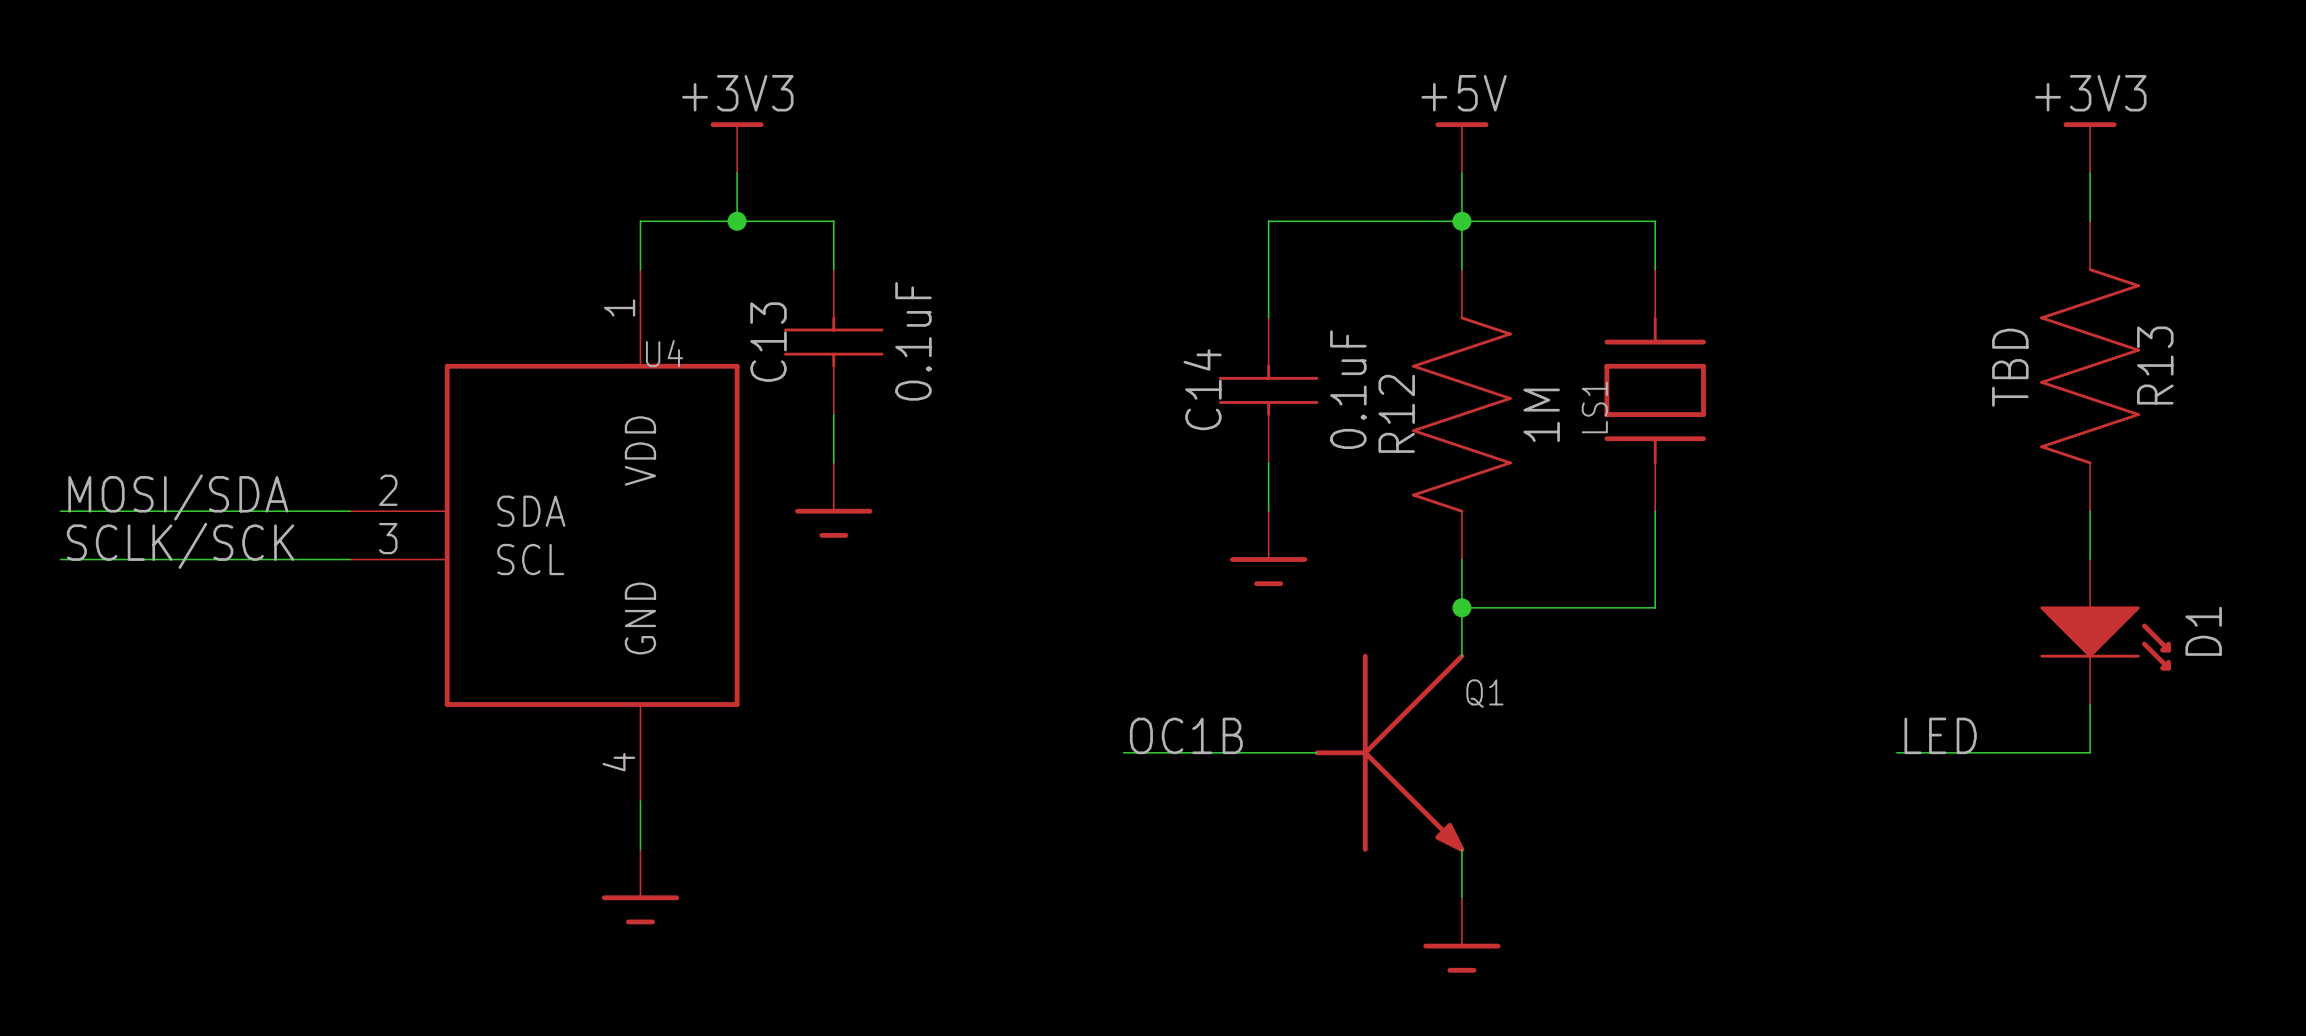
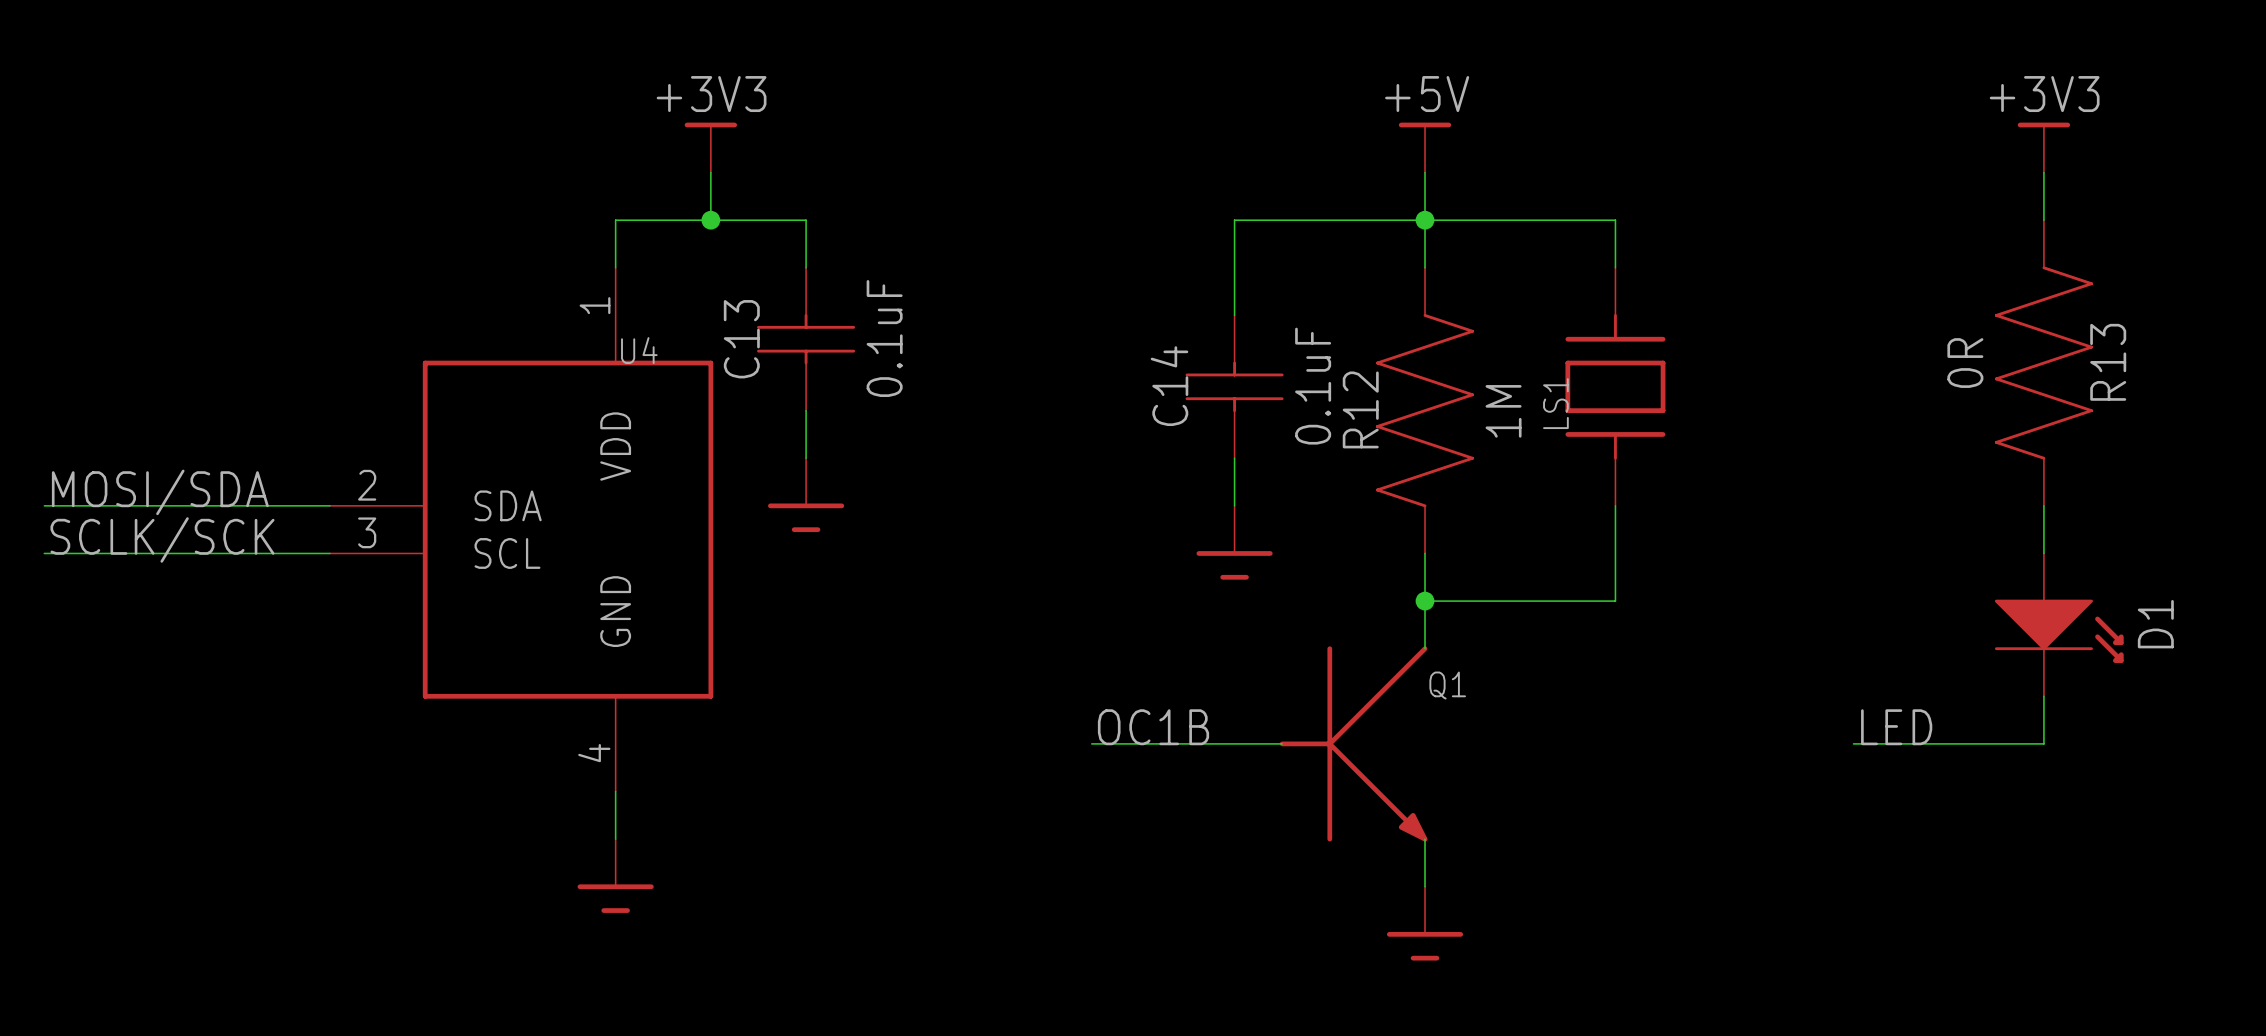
R13 value: TBD (2010, 367) -> 0R (1965, 363)

